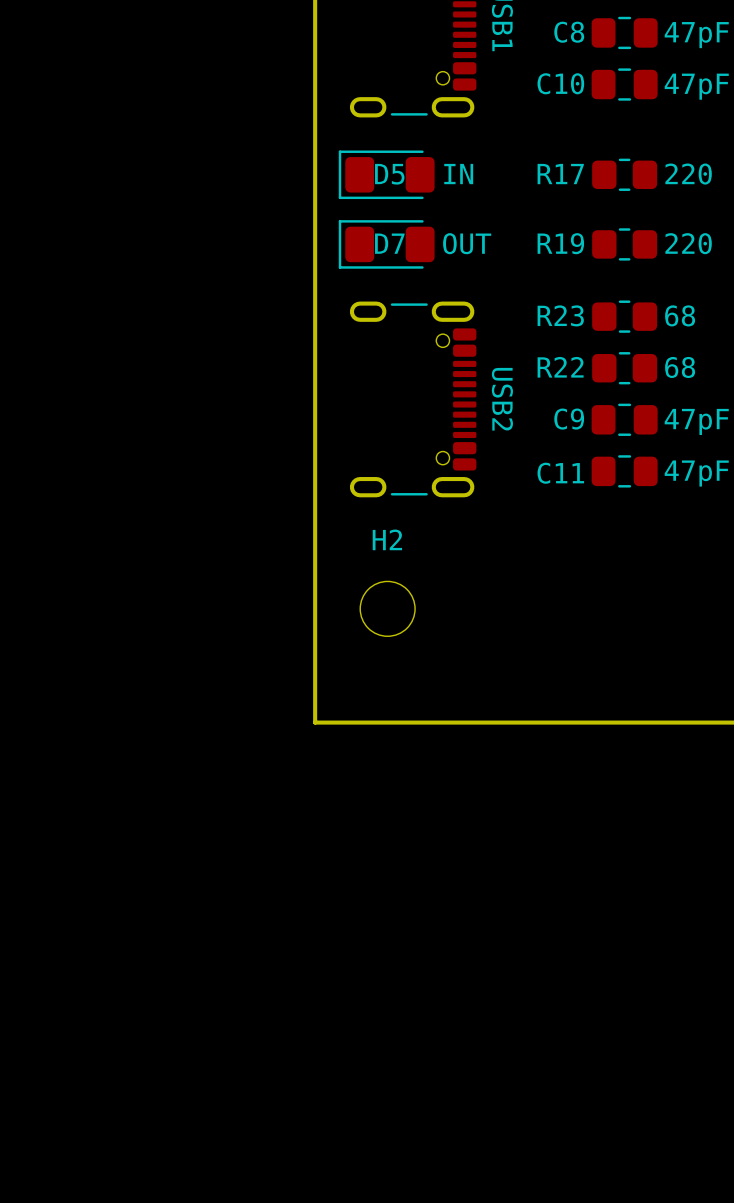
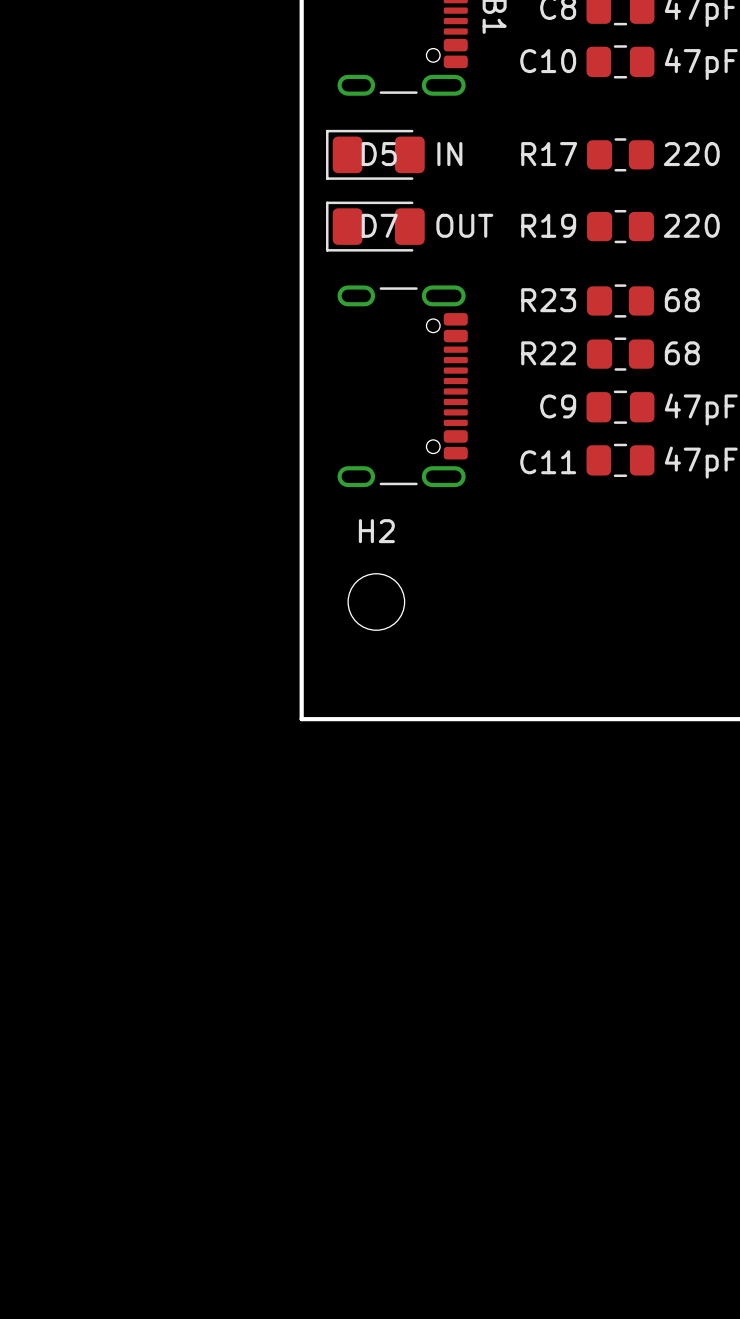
USB2 name: USB2 (502, 399) -> none

